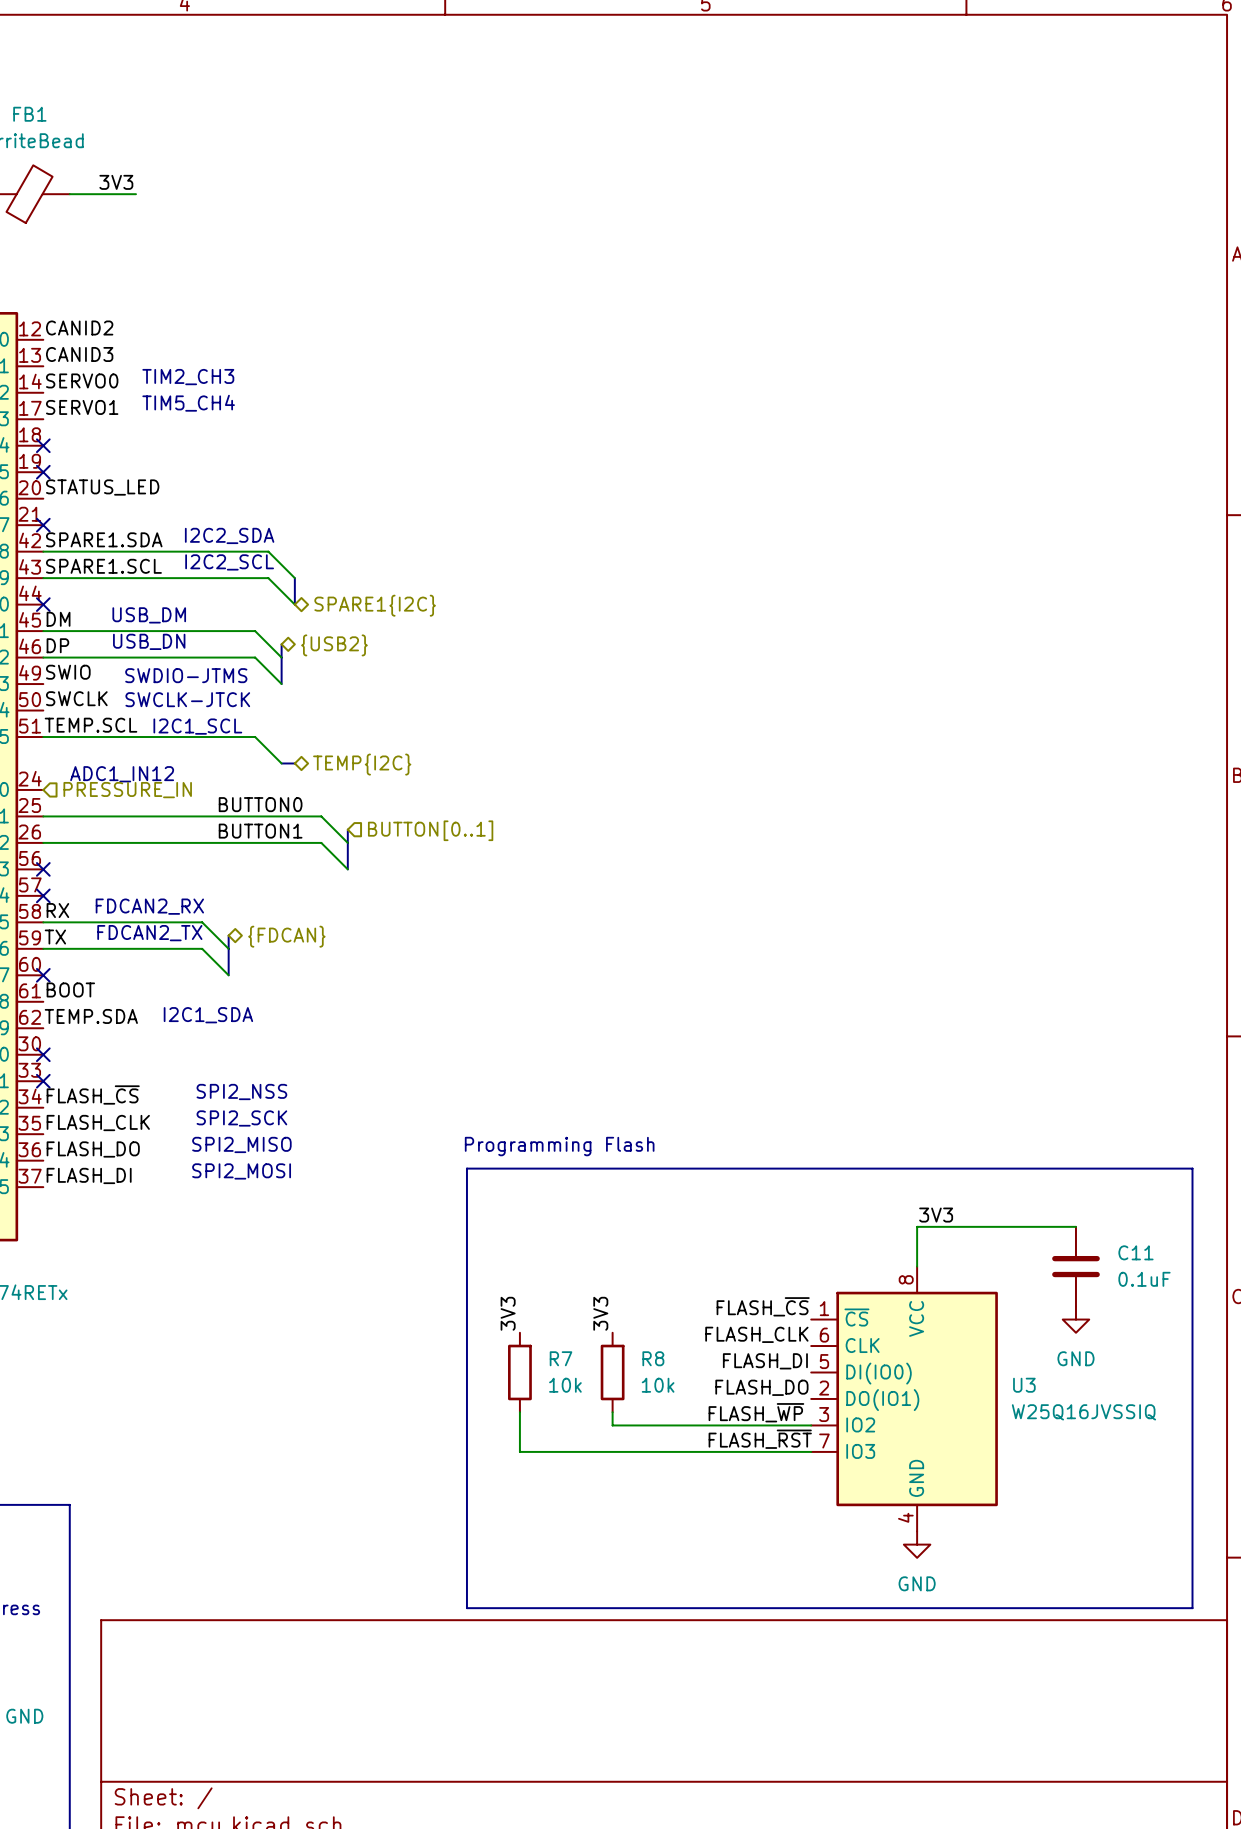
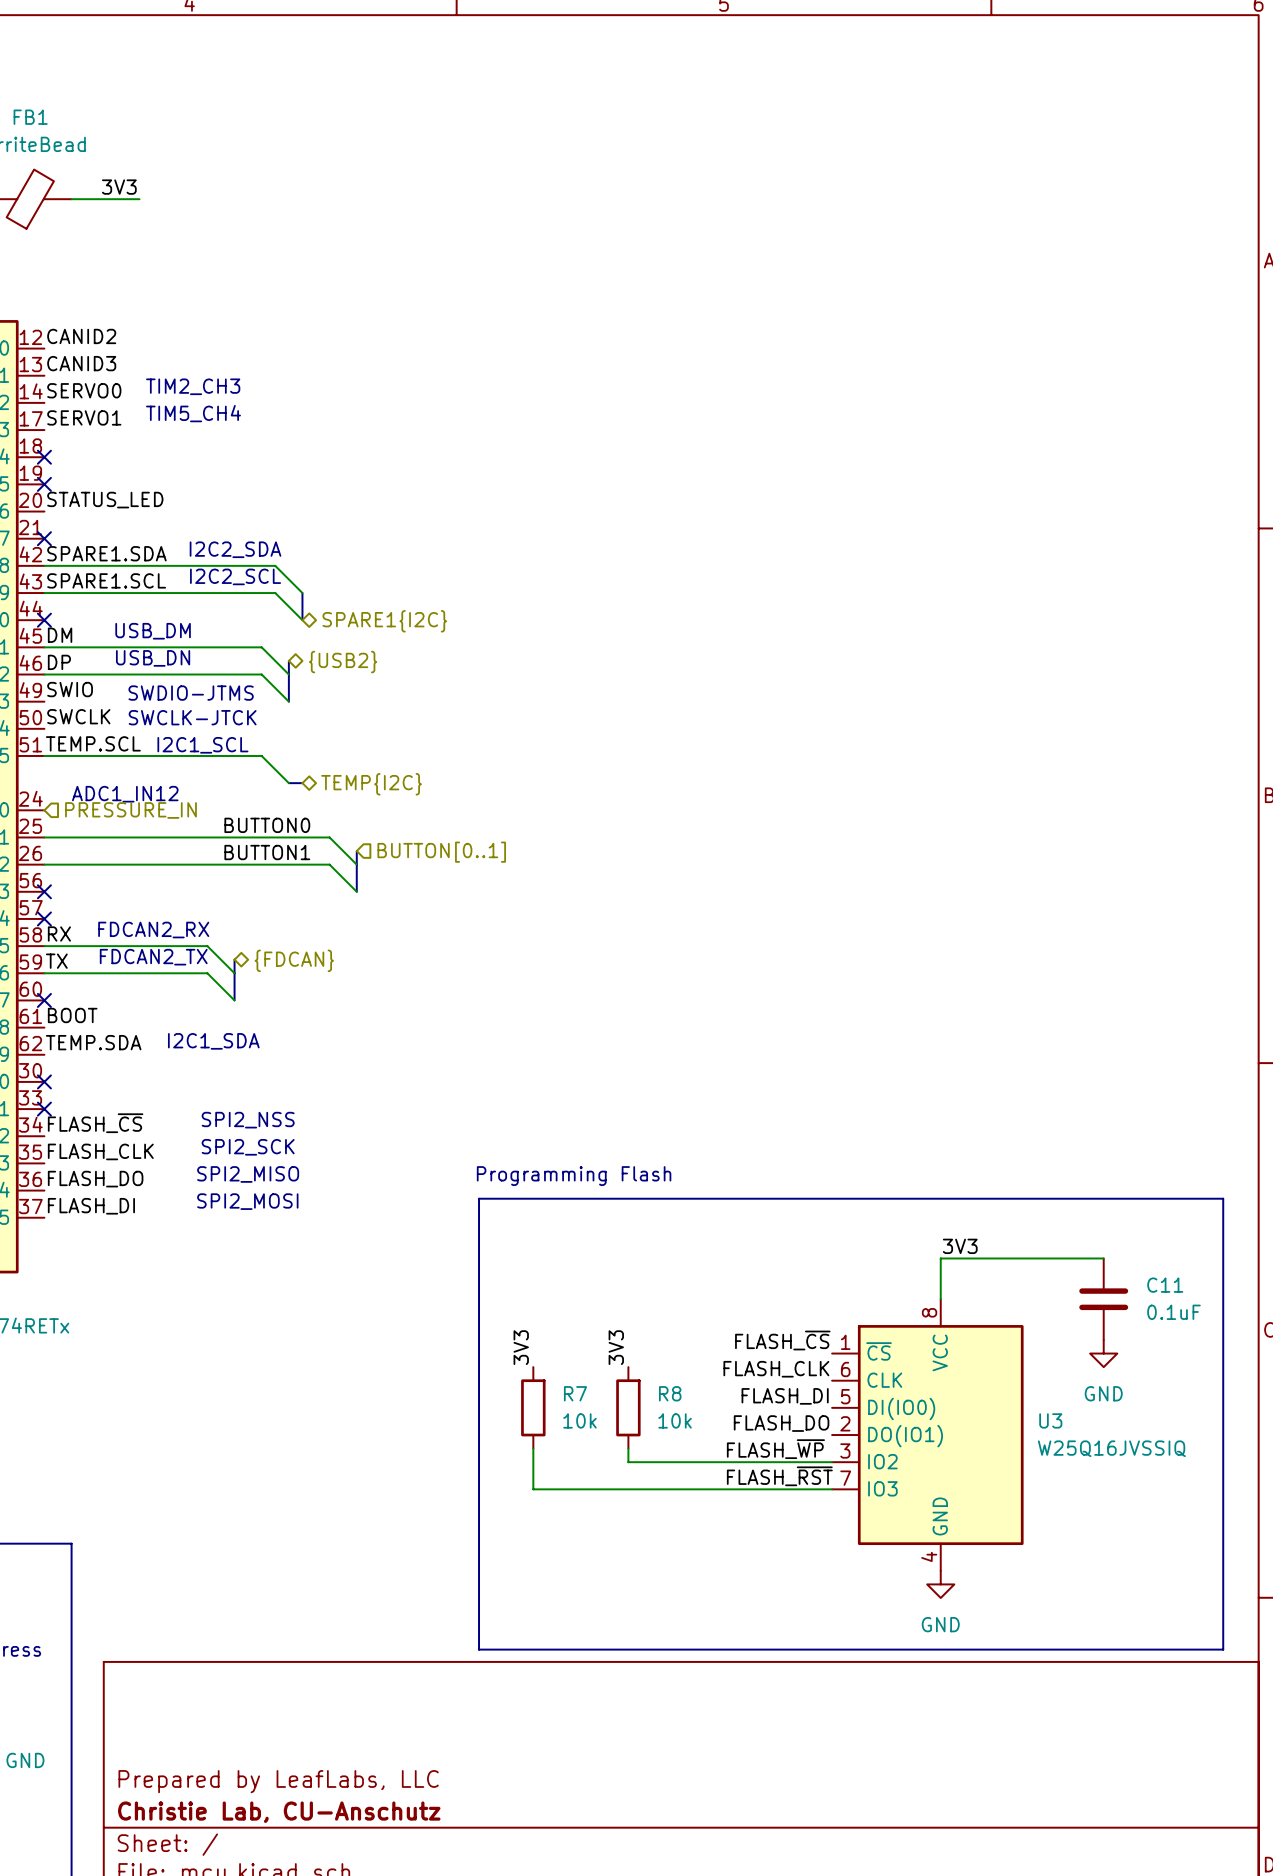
title block: none -> Prepared by LeafLabs, LLC (278, 1781)
title block: none -> Christie Lab, CU-Anschutz (279, 1812)

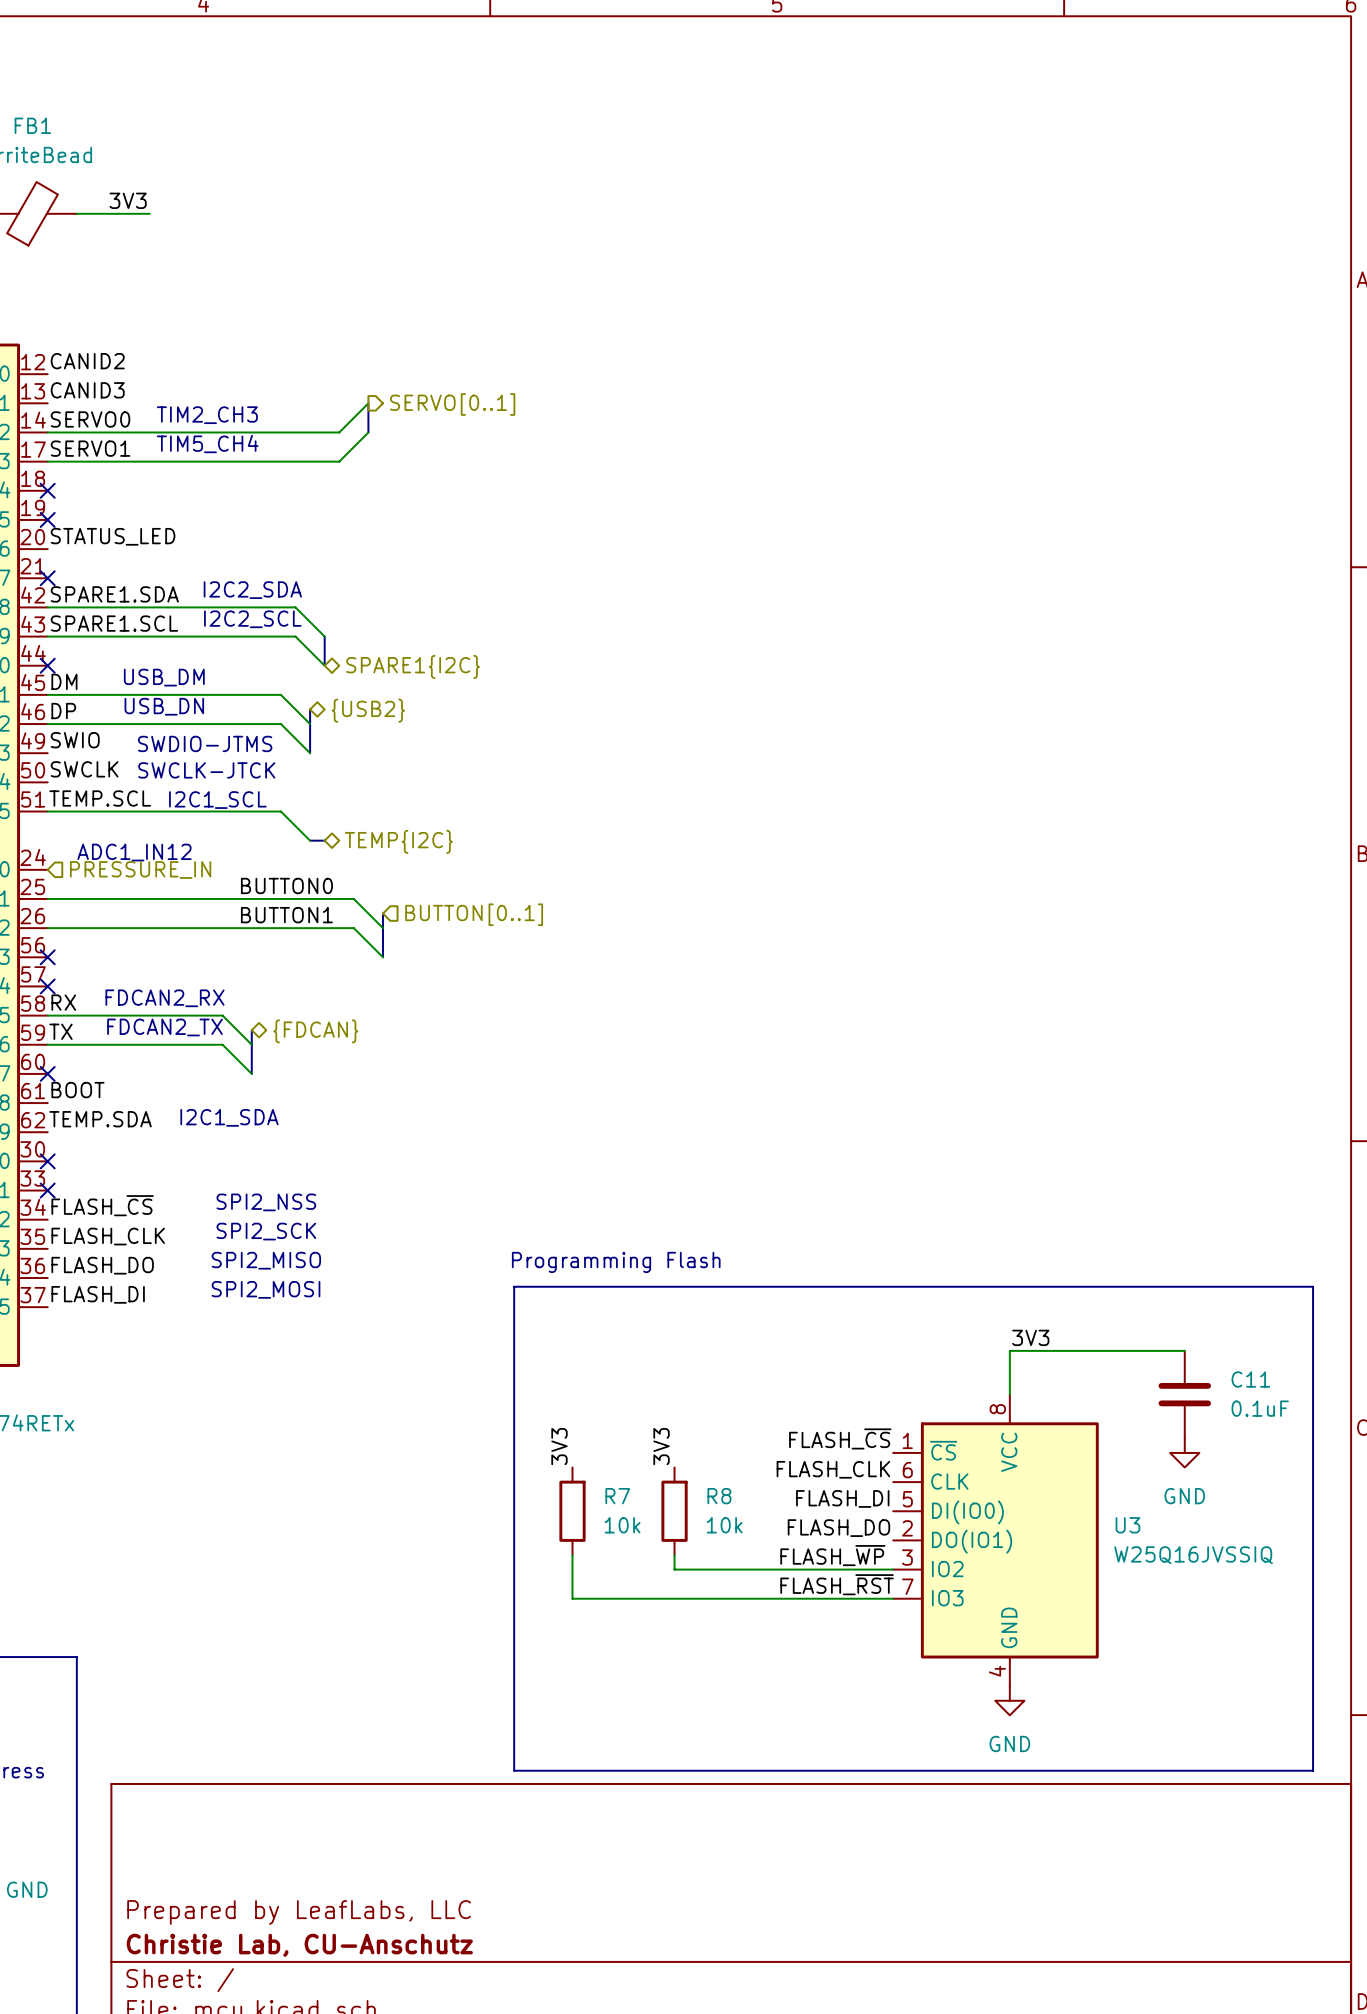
wire: none -> (368, 403) (339, 432) (47, 432)
bus: none -> (368, 403) (368, 432)
hierarchical label: none -> SERVO[0..1] (452, 404)
wire: none -> (368, 432) (339, 461) (47, 461)

